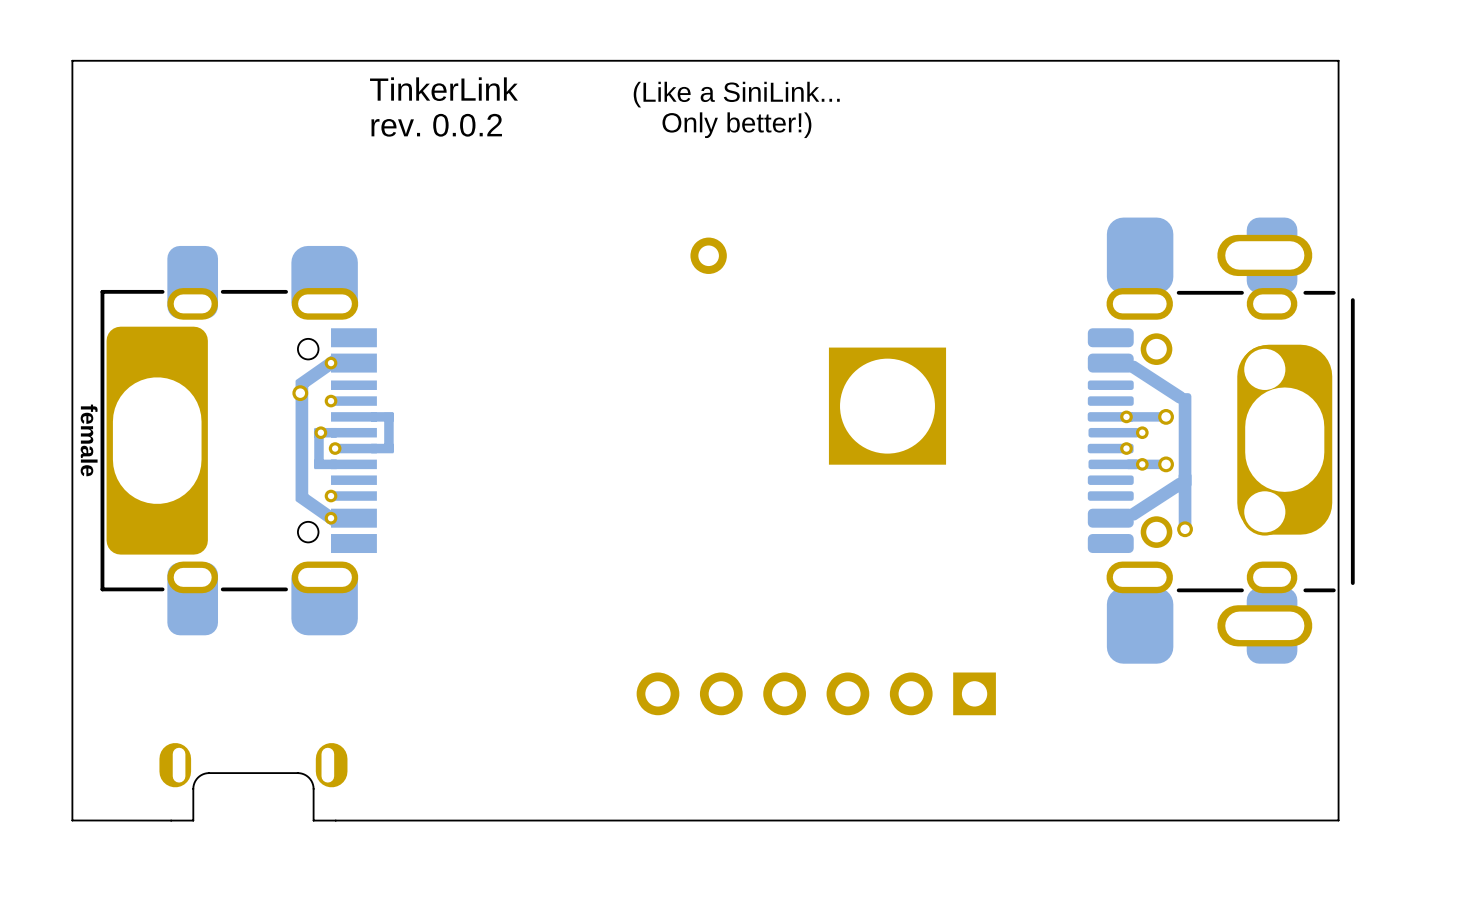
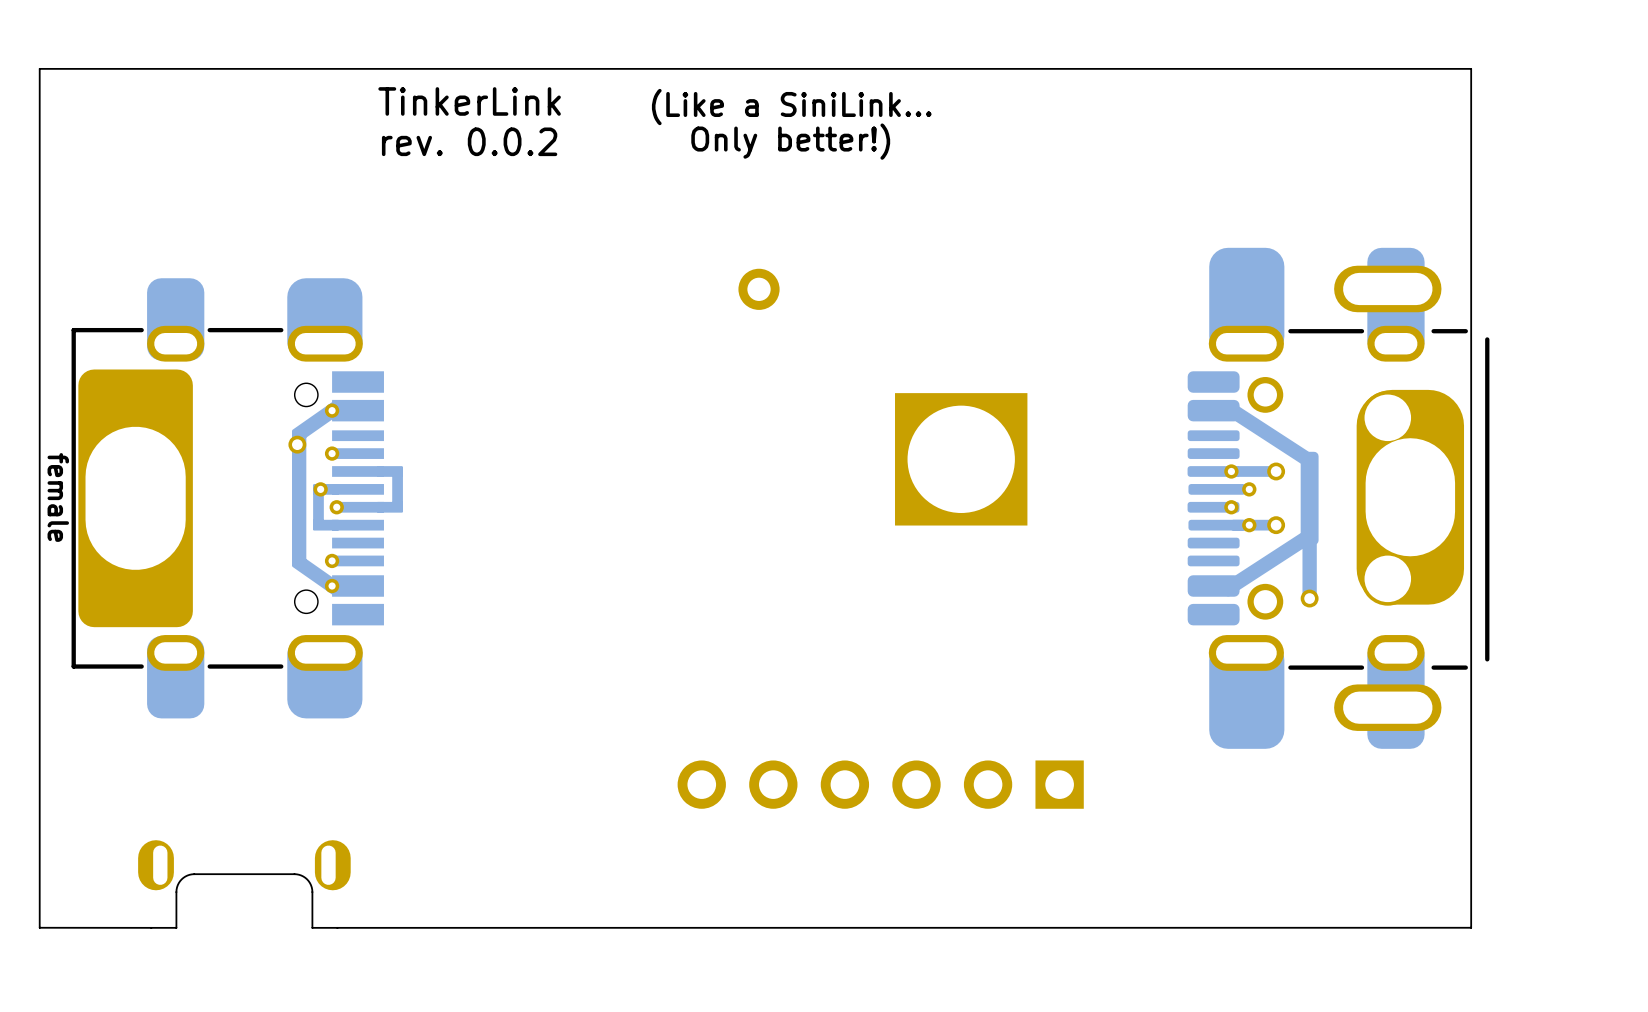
part footprint: [1087, 217, 1355, 664] -> [1187, 247, 1490, 749]

